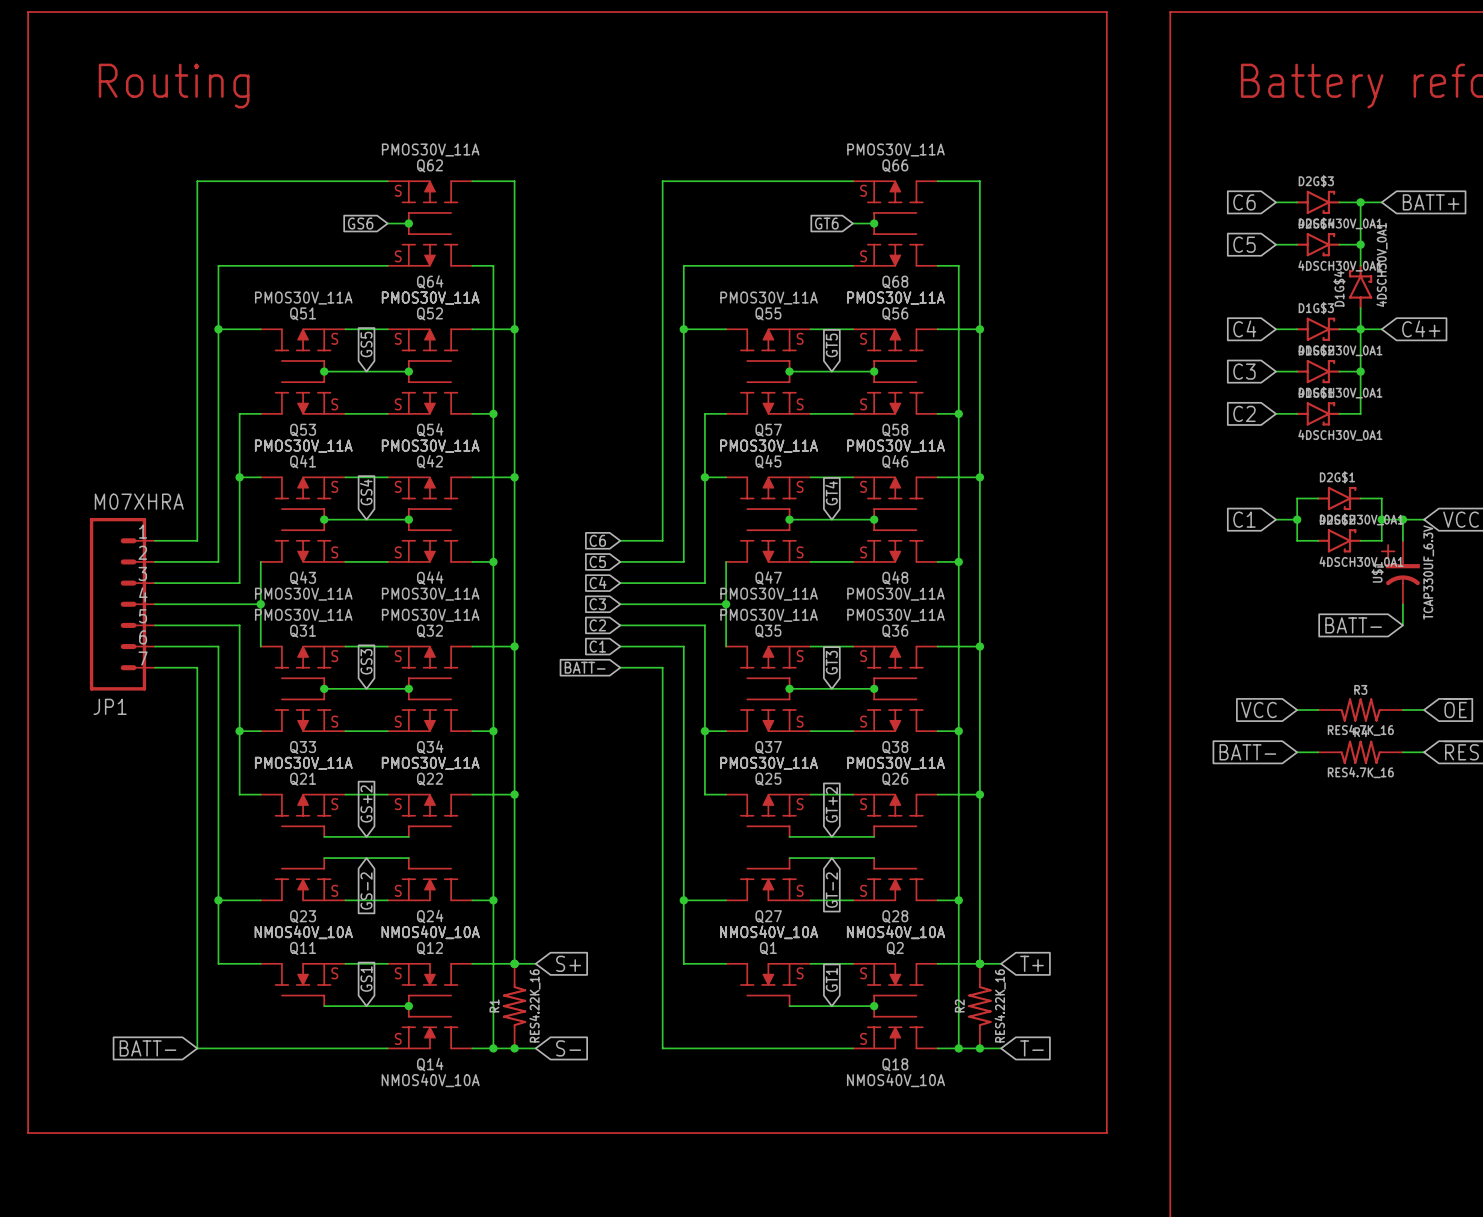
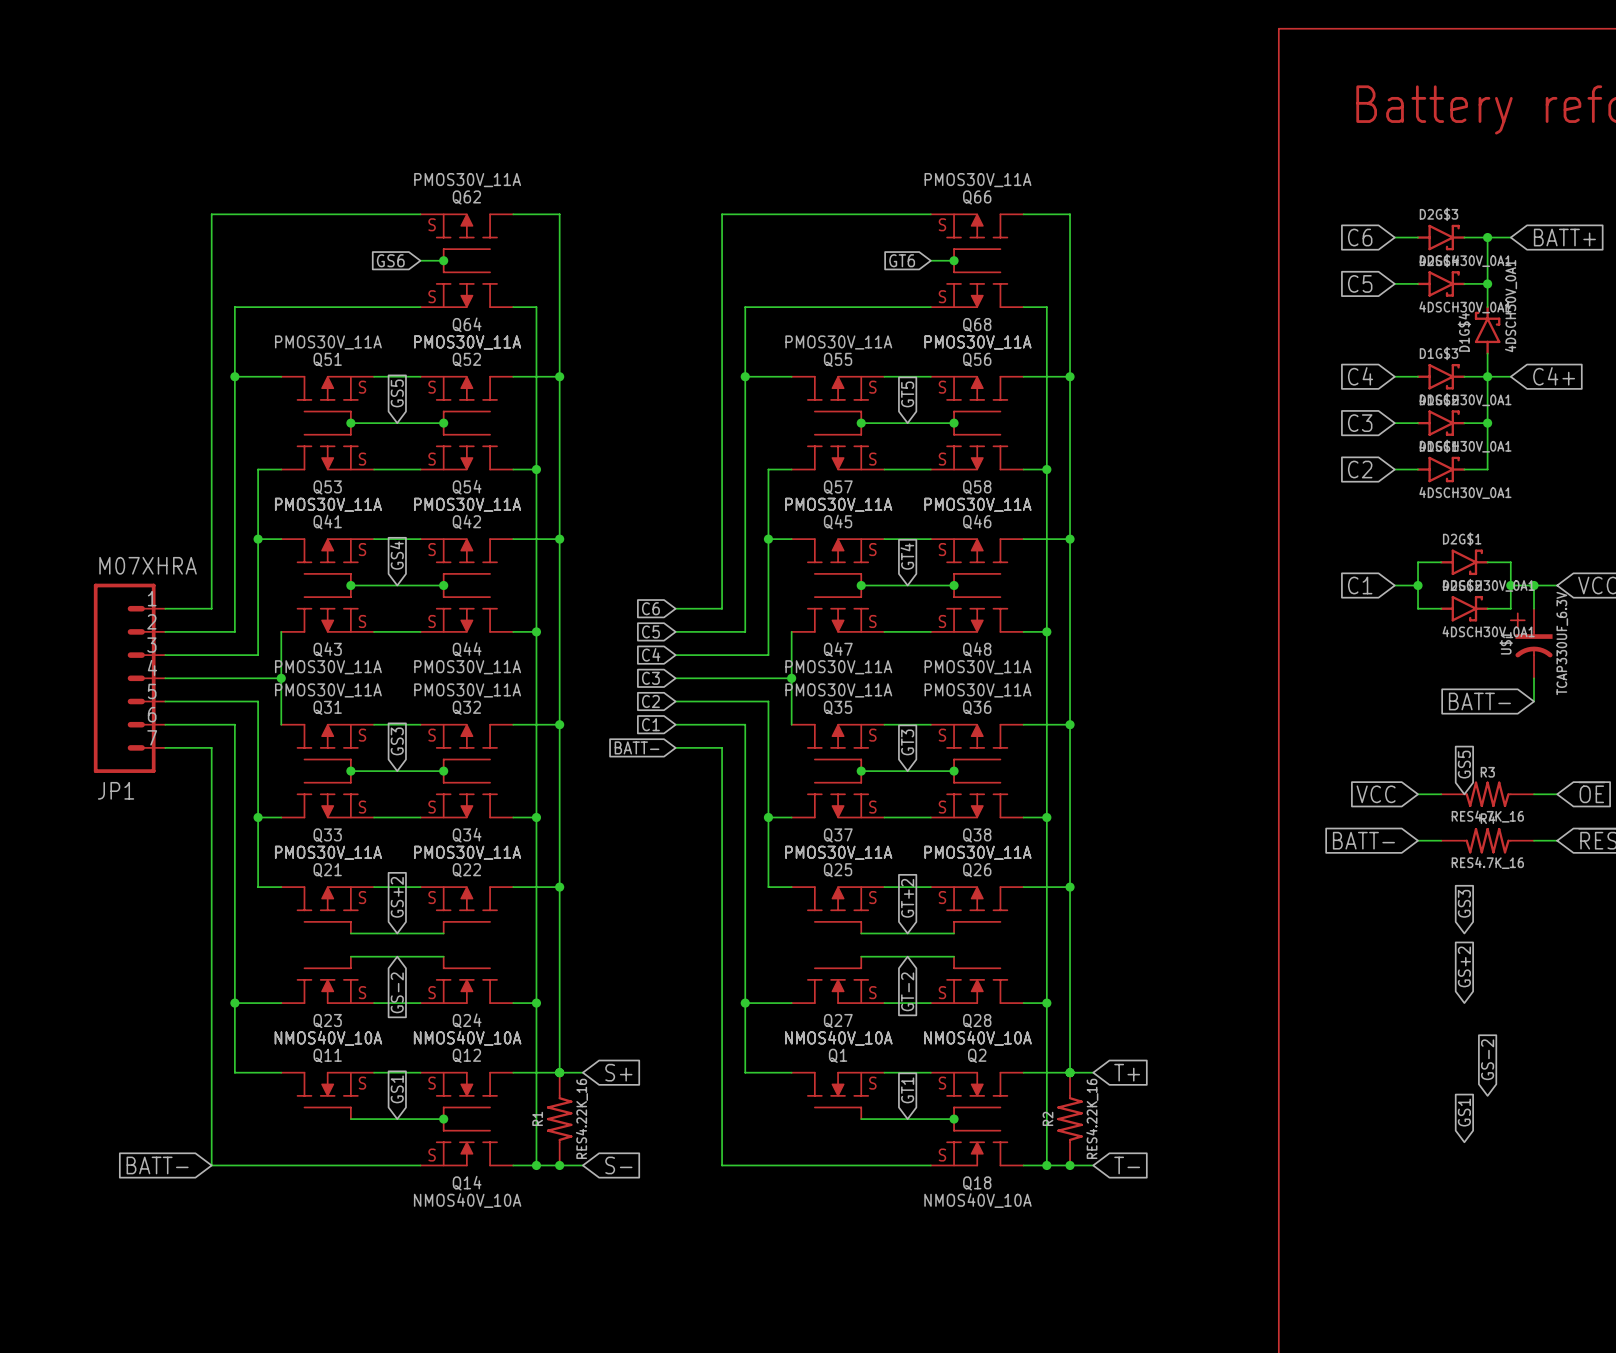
line: (28, 12) (1106, 12) (1106, 1133) (28, 1133) (28, 12) -> none
text: Routing (174, 86) -> none
global label: none -> GS5 (1464, 764)
global label: none -> GS3 (1464, 903)
global label: none -> GS+2 (1464, 966)
global label: none -> GS-2 (1487, 1059)
global label: none -> GS1 (1464, 1112)

